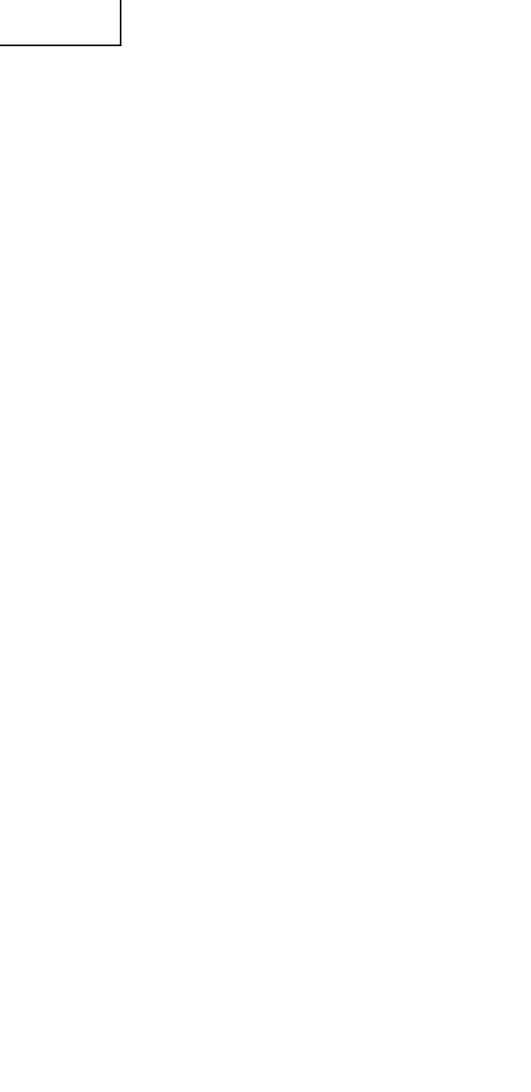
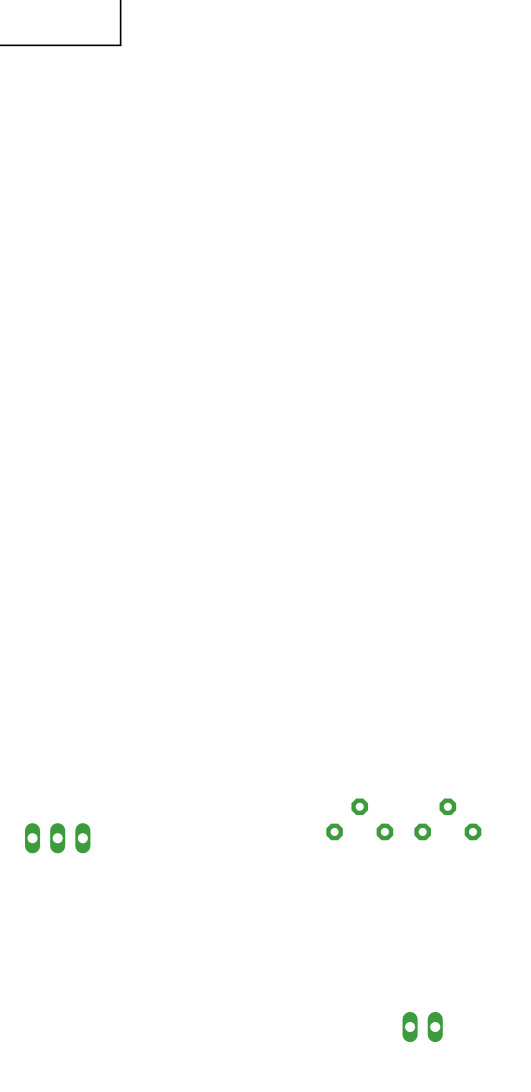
part: none -> (359, 819)
part: none -> (447, 819)
part: none -> (57, 838)
part: none -> (422, 1027)

